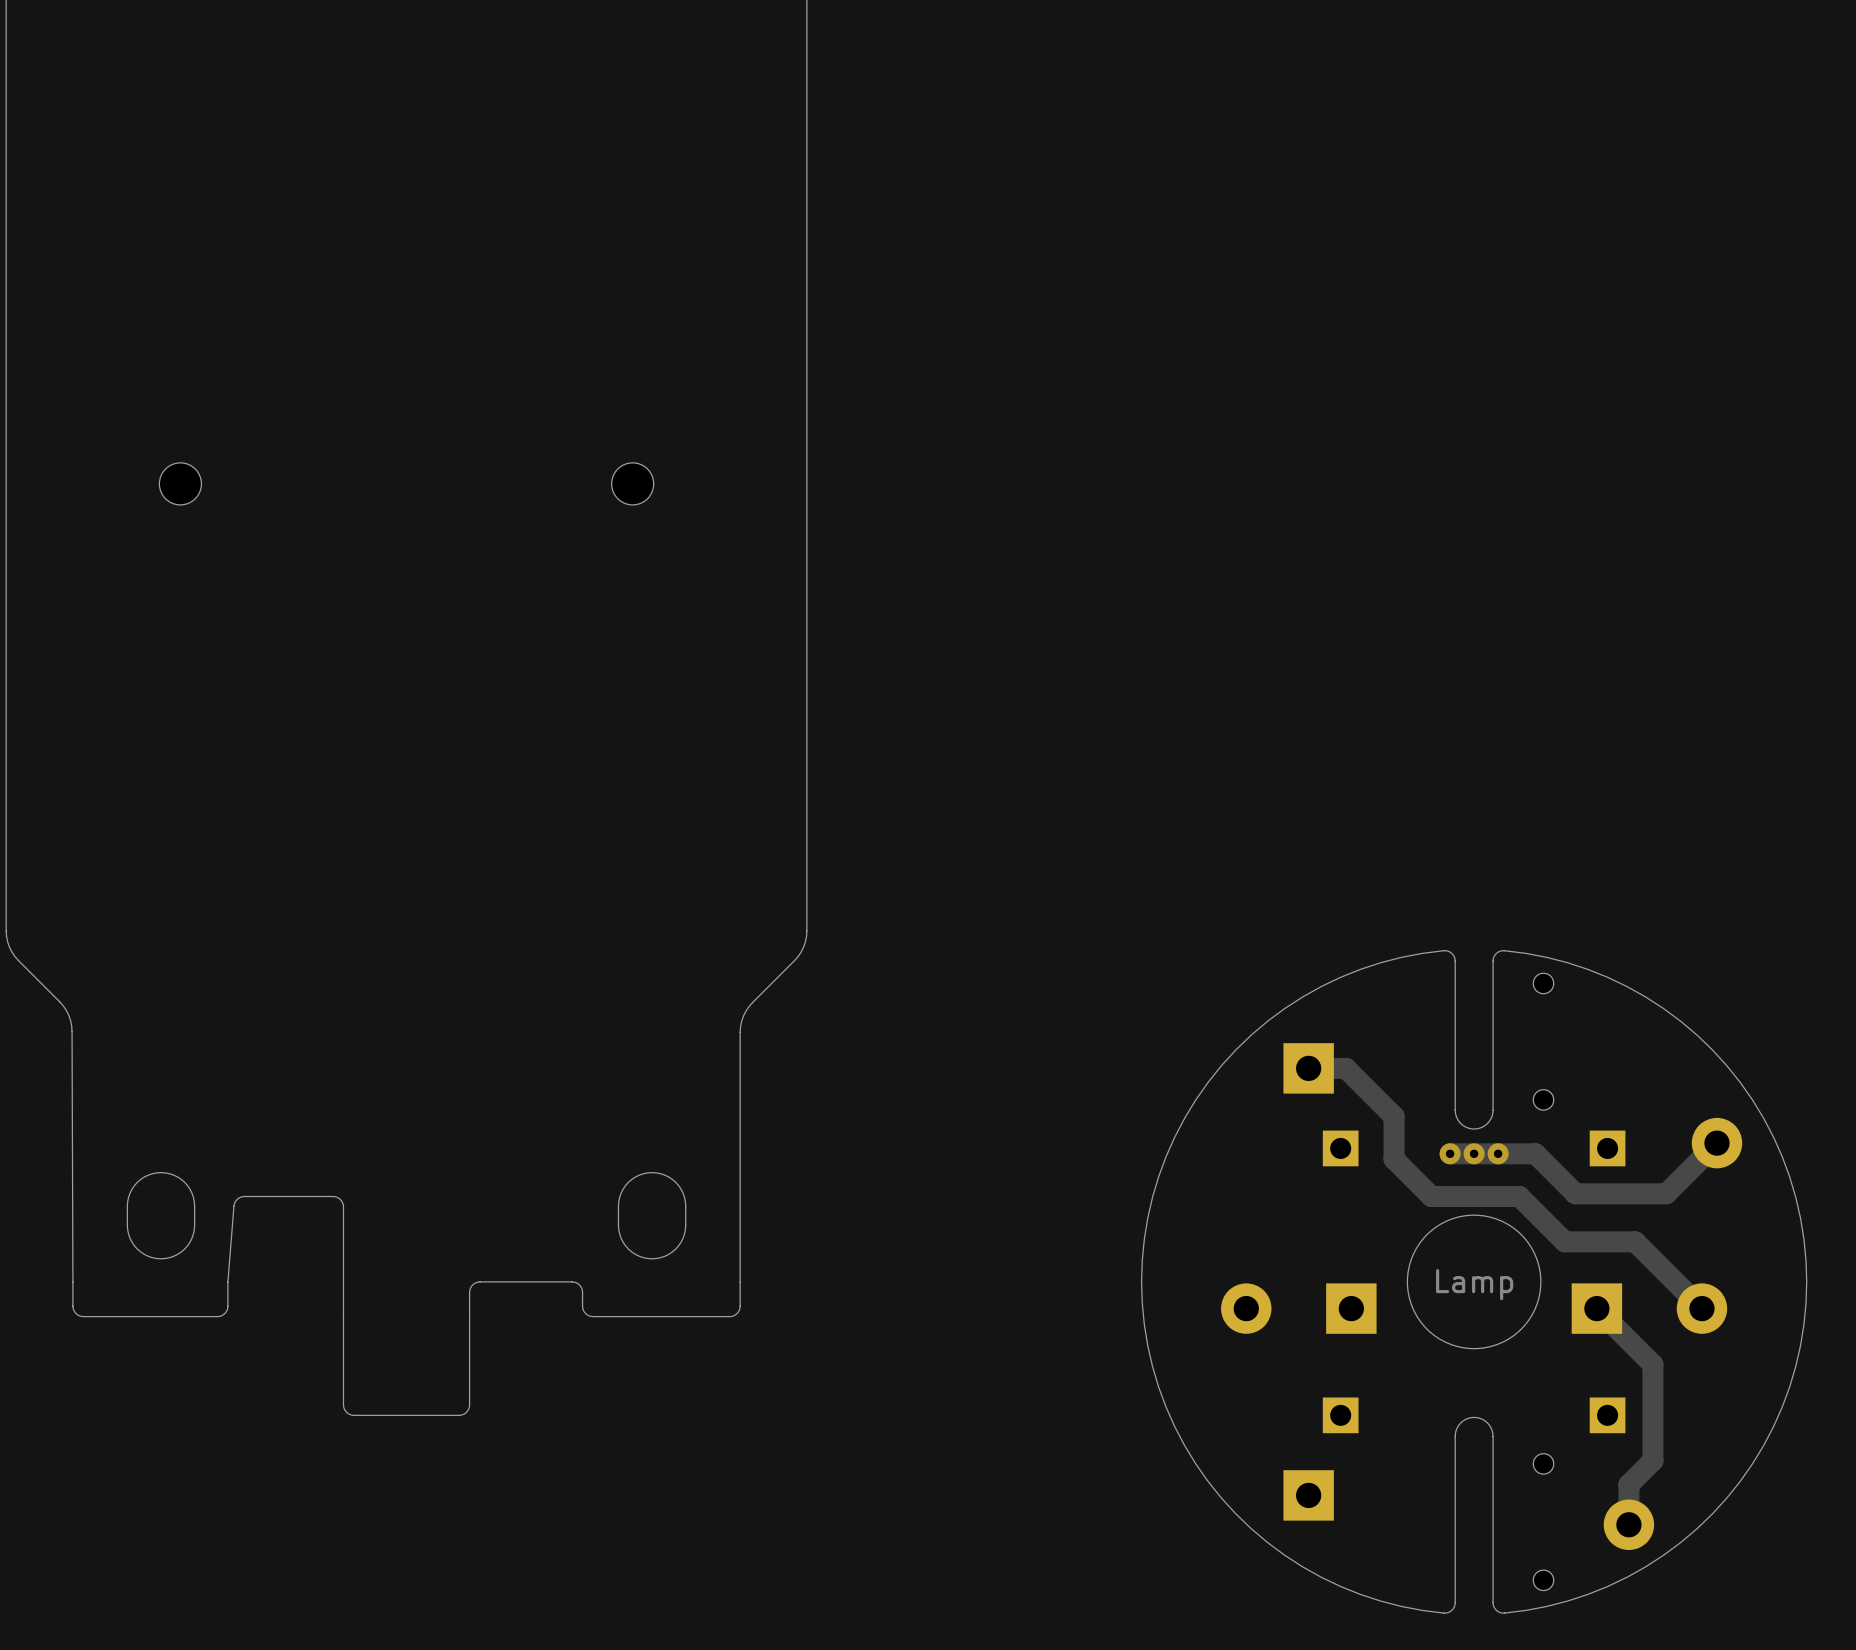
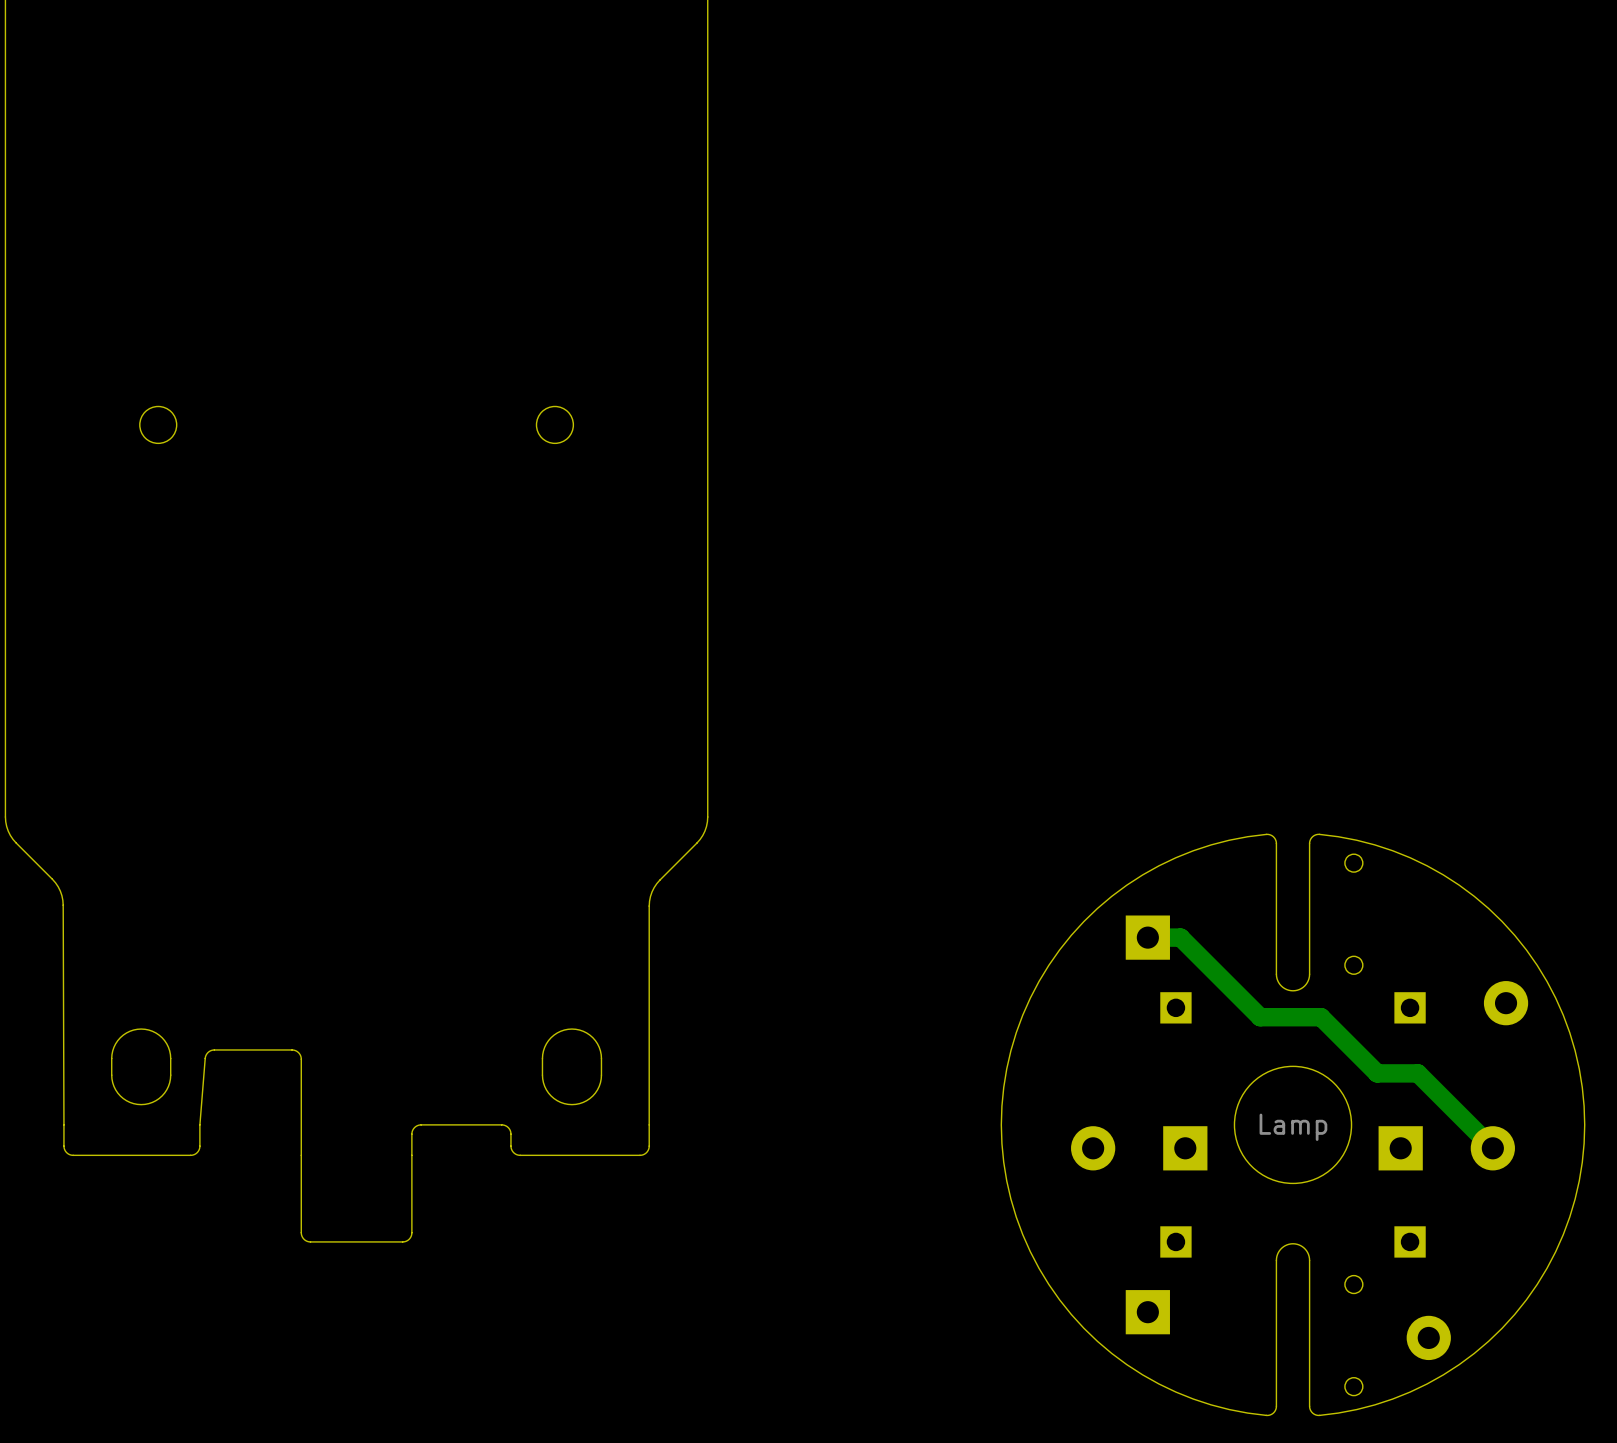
track: (1394, 1116) (1394, 1159) (1431, 1196) (1519, 1196) (1564, 1241) (1635, 1241) -> (1222, 979) (1260, 1017) (1321, 1017) (1377, 1073) (1417, 1073) (1434, 1089)
track: (1717, 1143) (1666, 1193) (1575, 1193) (1535, 1153) (1450, 1153) -> none
via: (1450, 1153) -> none
via: (1474, 1153) -> none
via: (1498, 1153) -> none
track: (1596, 1308) (1652, 1364) (1652, 1460) (1628, 1484) (1628, 1524) -> none

